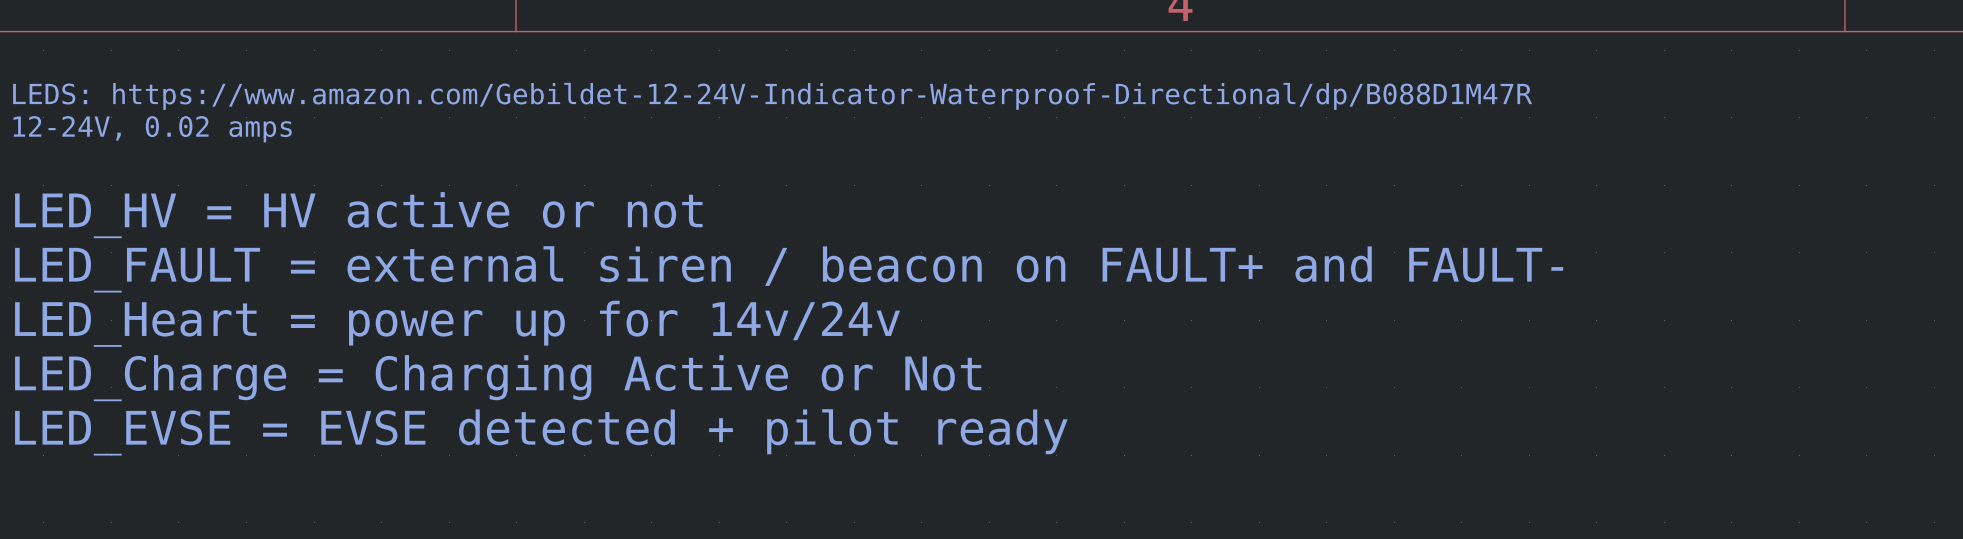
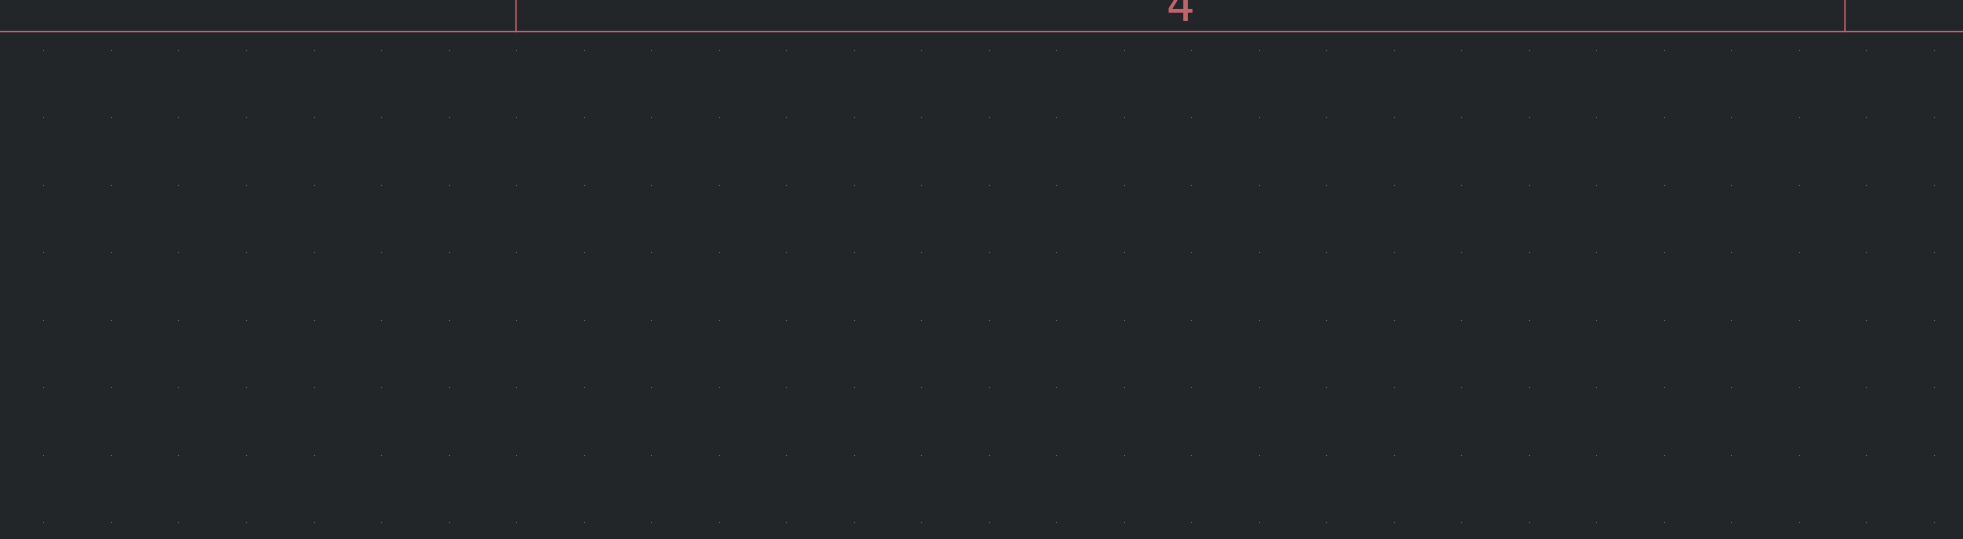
text: LEDS: https://www.amazon.com/Gebildet-12-24V-Indicator-Waterproof-Directional/dp/B088D1M47R (772, 96) -> none
text: 12-24V, 0.02 amps (152, 129) -> none
text: LED_HV = HV active or not (358, 215) -> none
text: LED_FAULT = external siren / beacon on FAULT+ and FAULT- (789, 269) -> none
text: LED_Heart = power up for 14v/24v (457, 323) -> none
text: LED_Charge = Charging Active or Not (498, 378) -> none
text: LED_EVSE = EVSE detected + pilot ready (541, 432) -> none

